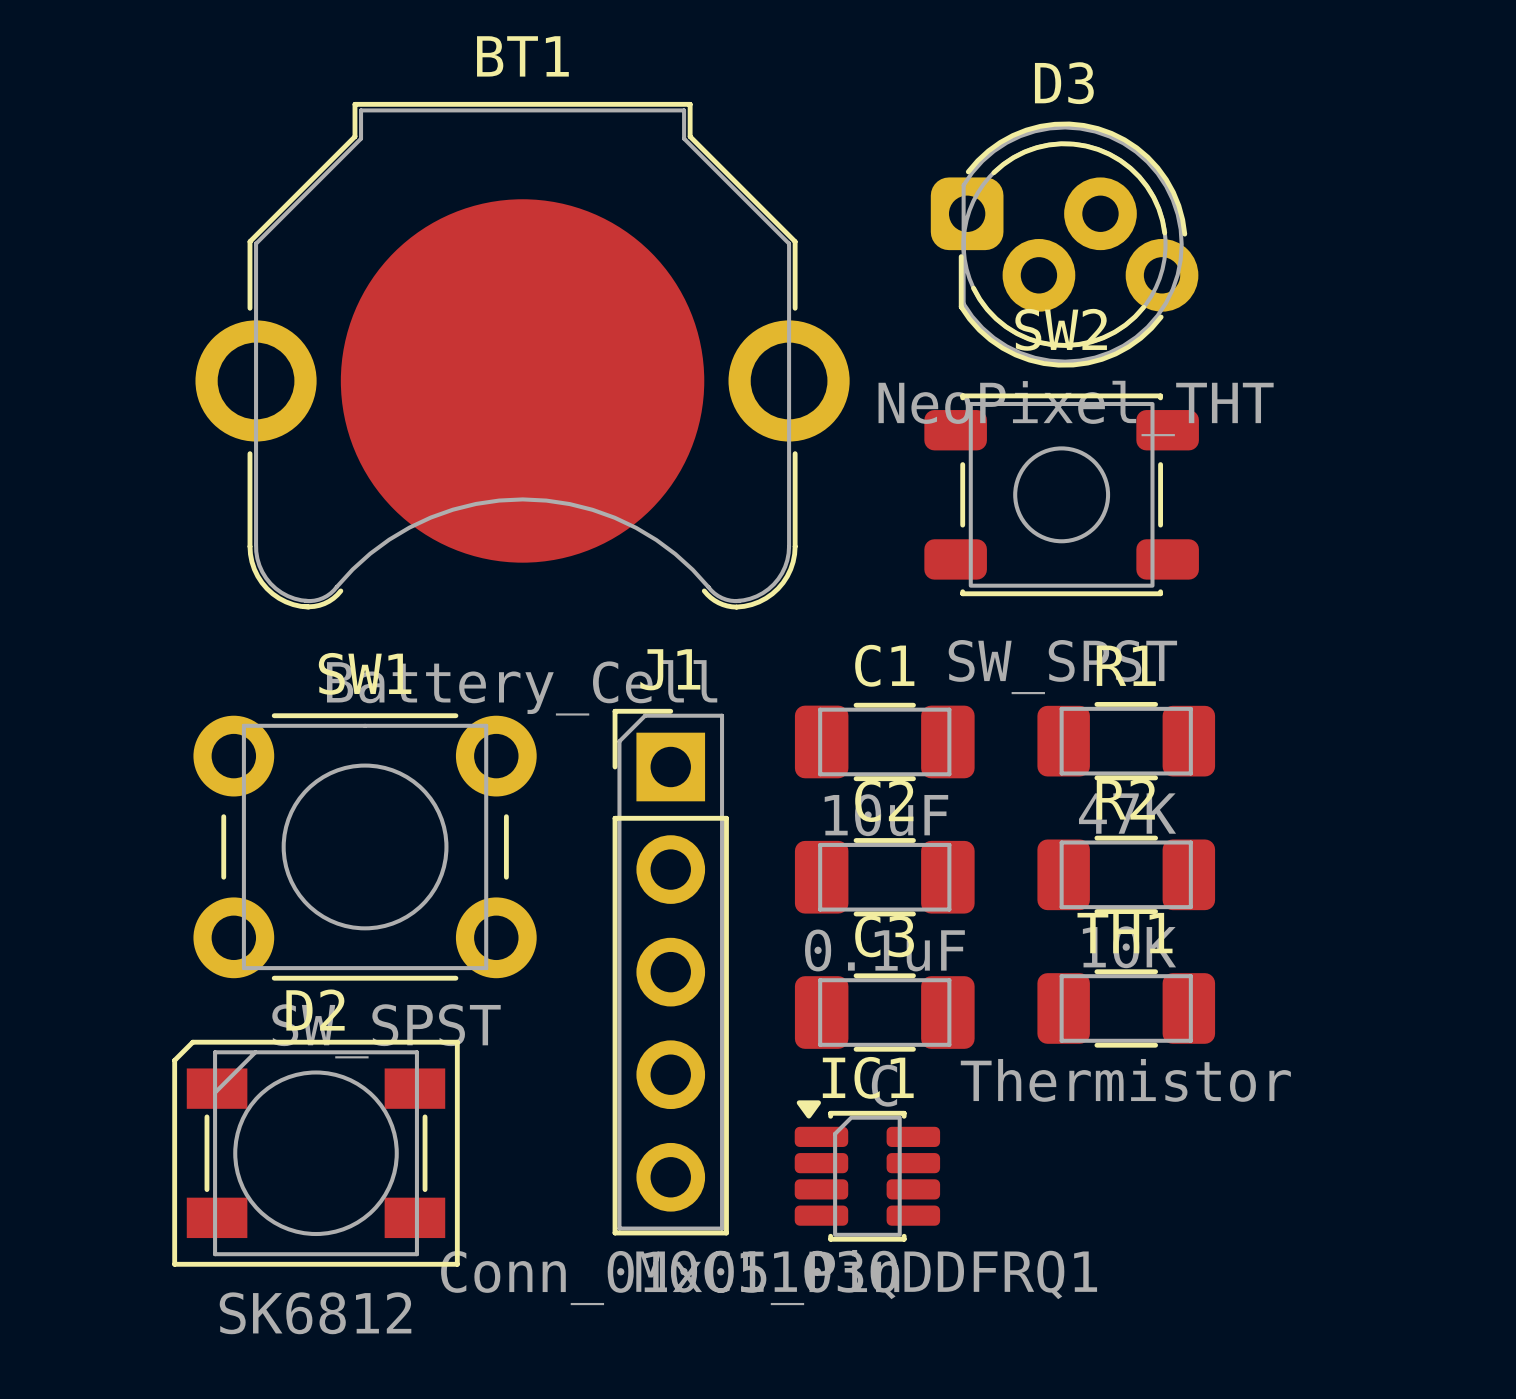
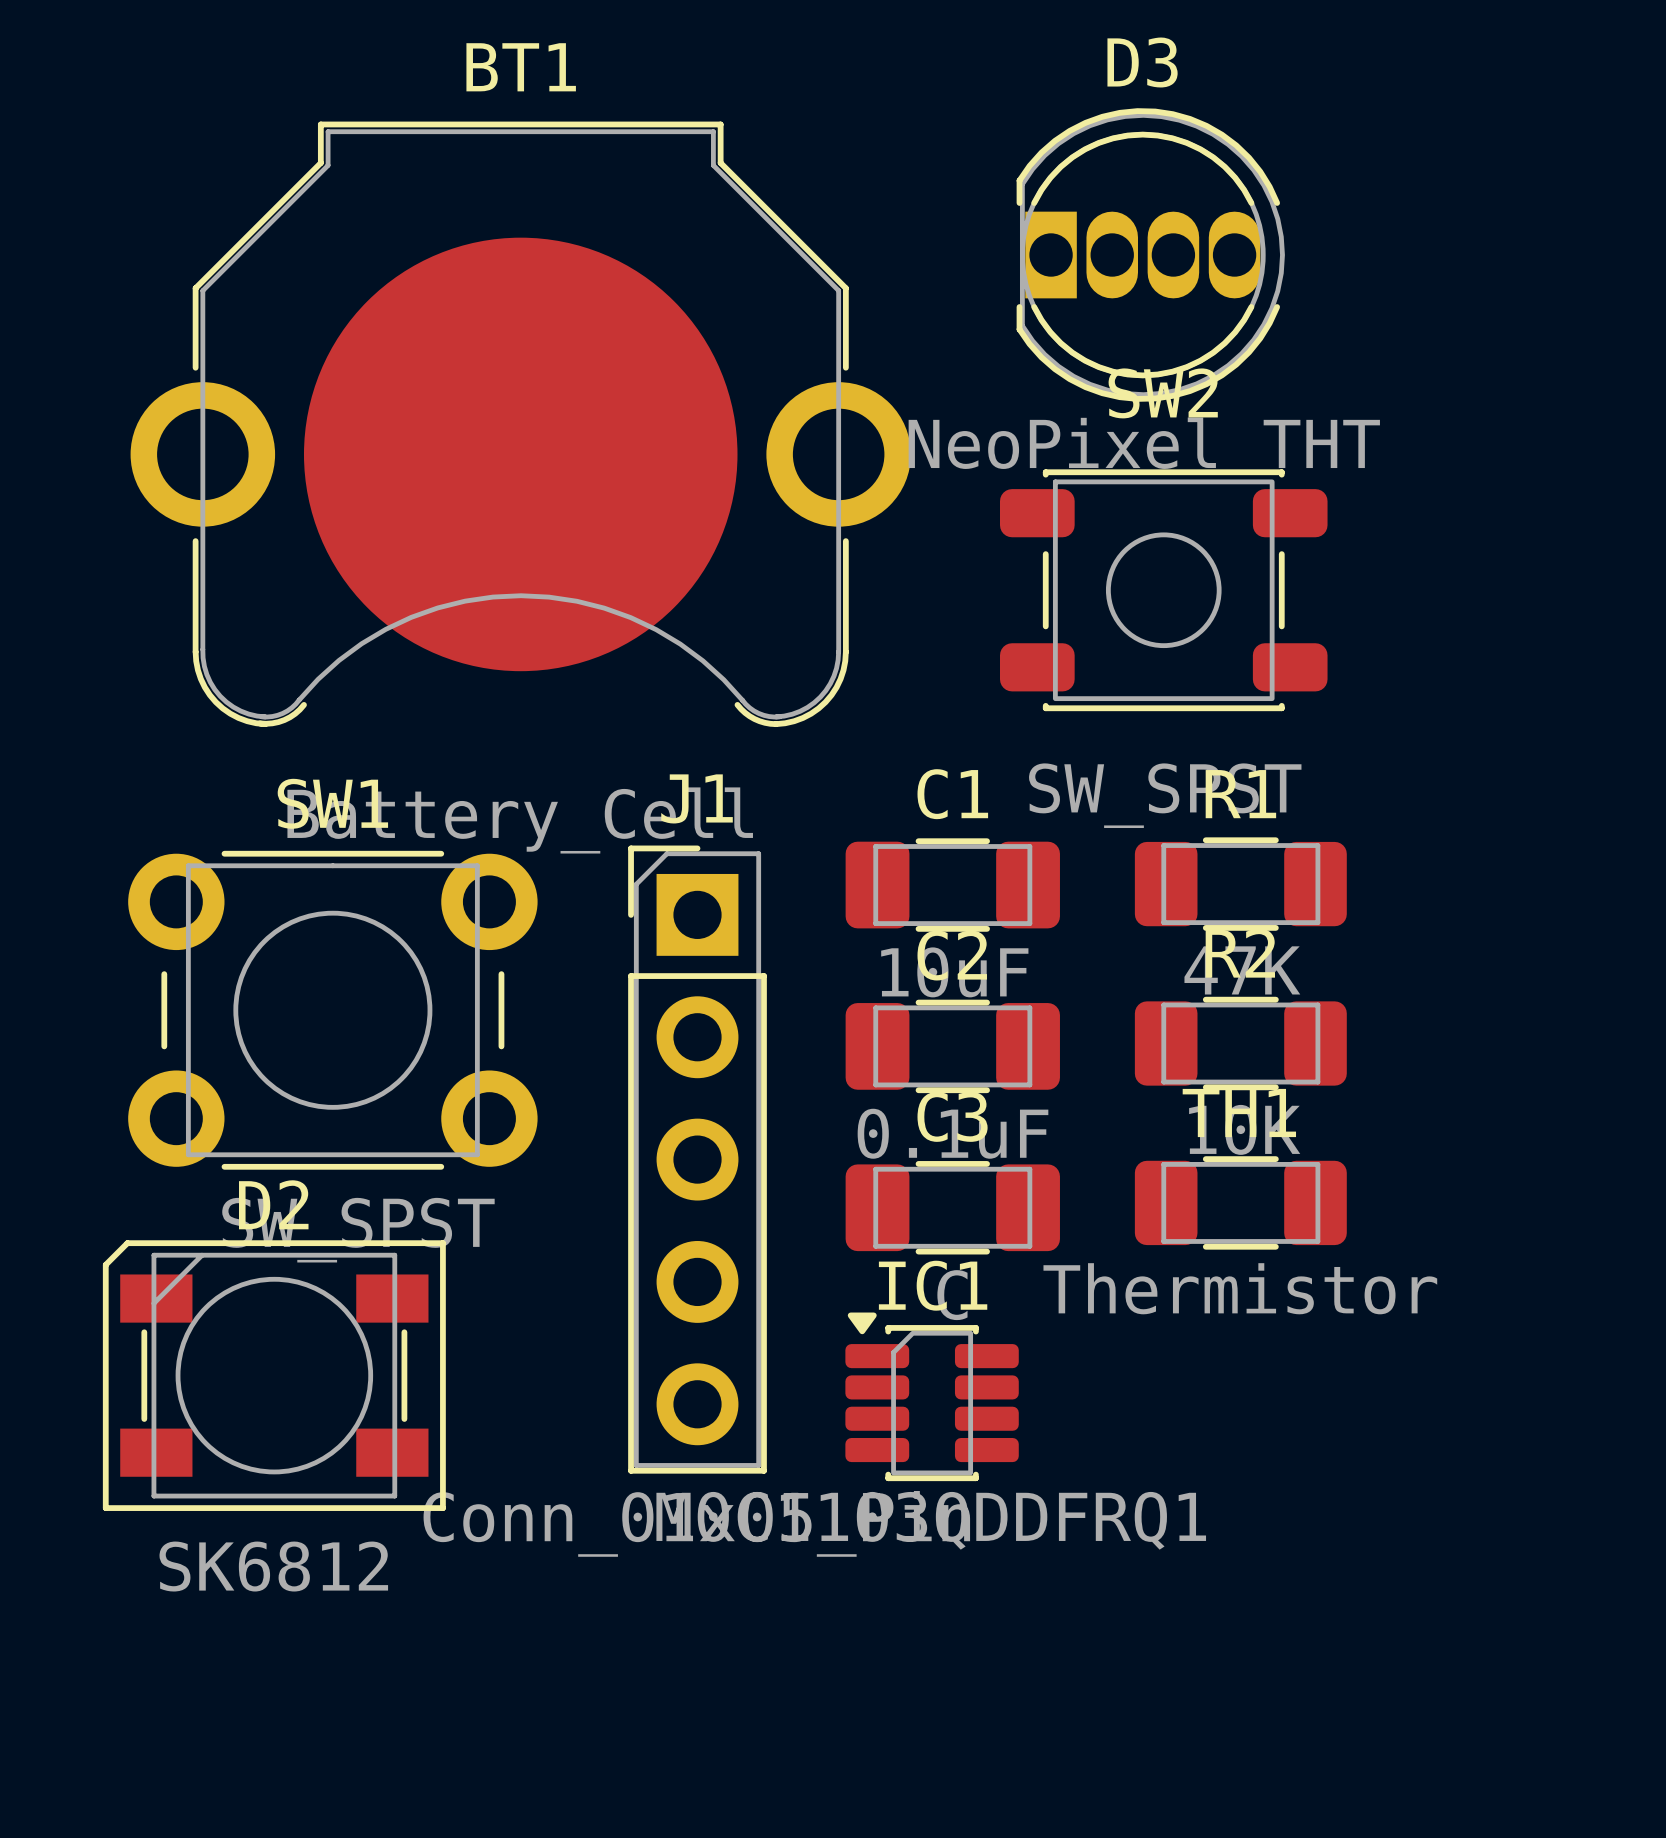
D3 footprint: [930, 121, 1199, 368] -> [1016, 108, 1285, 402]

